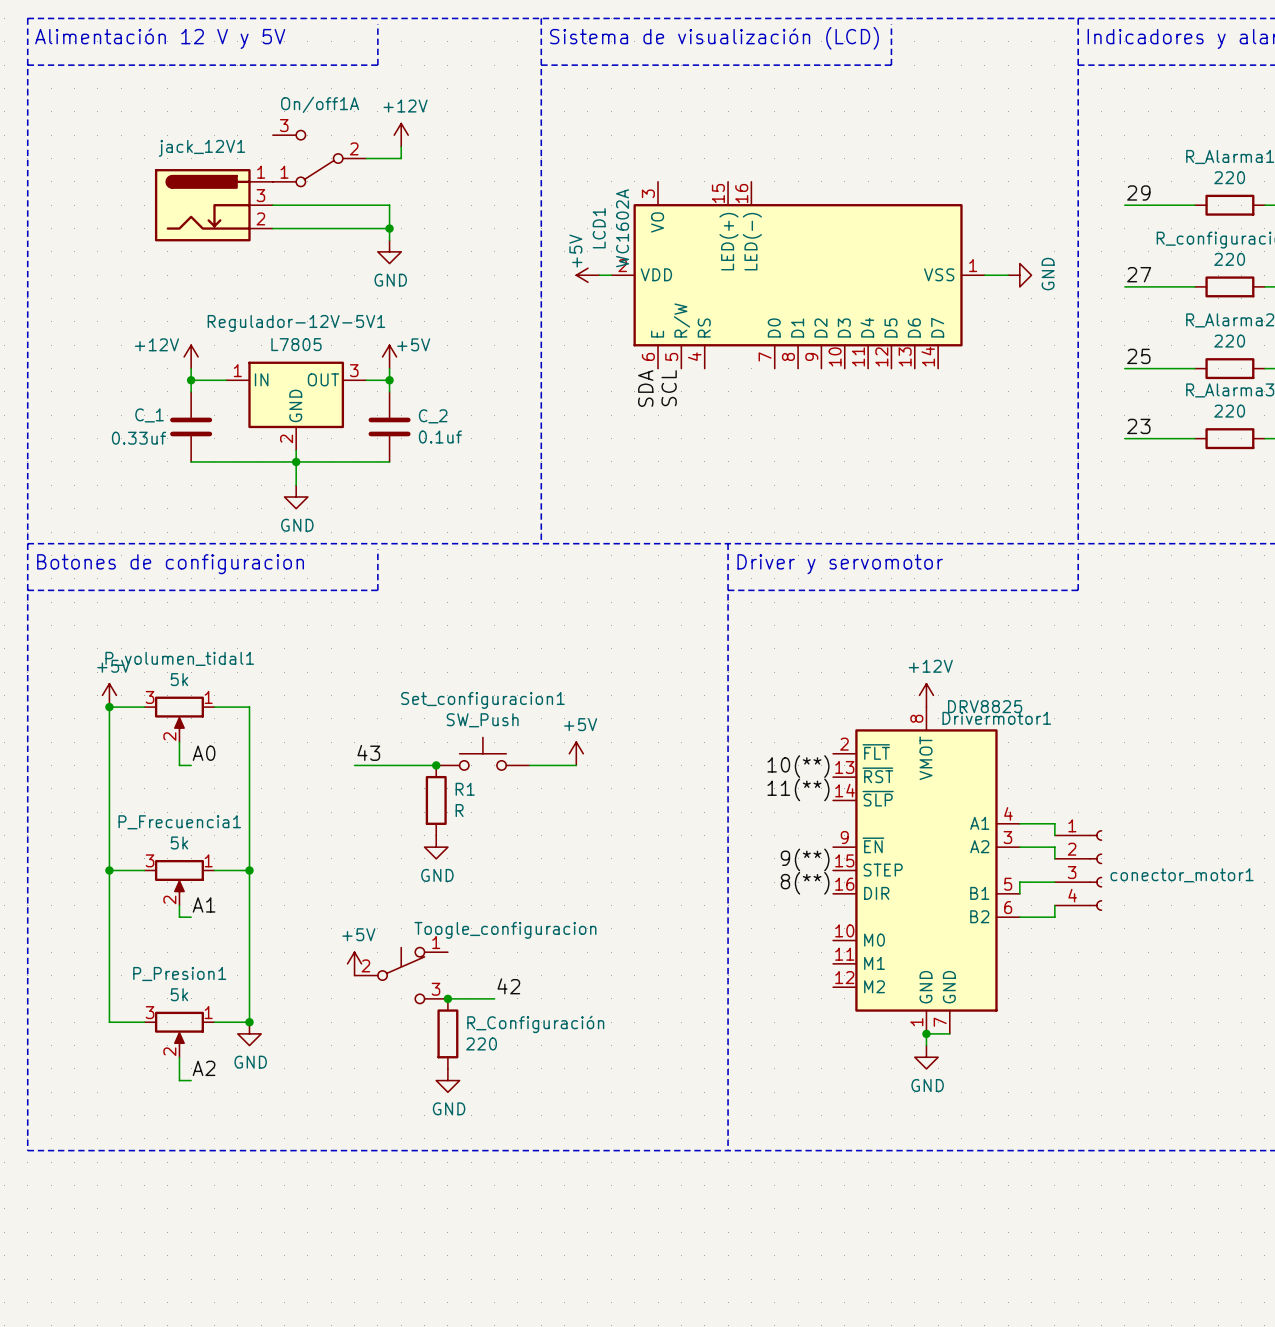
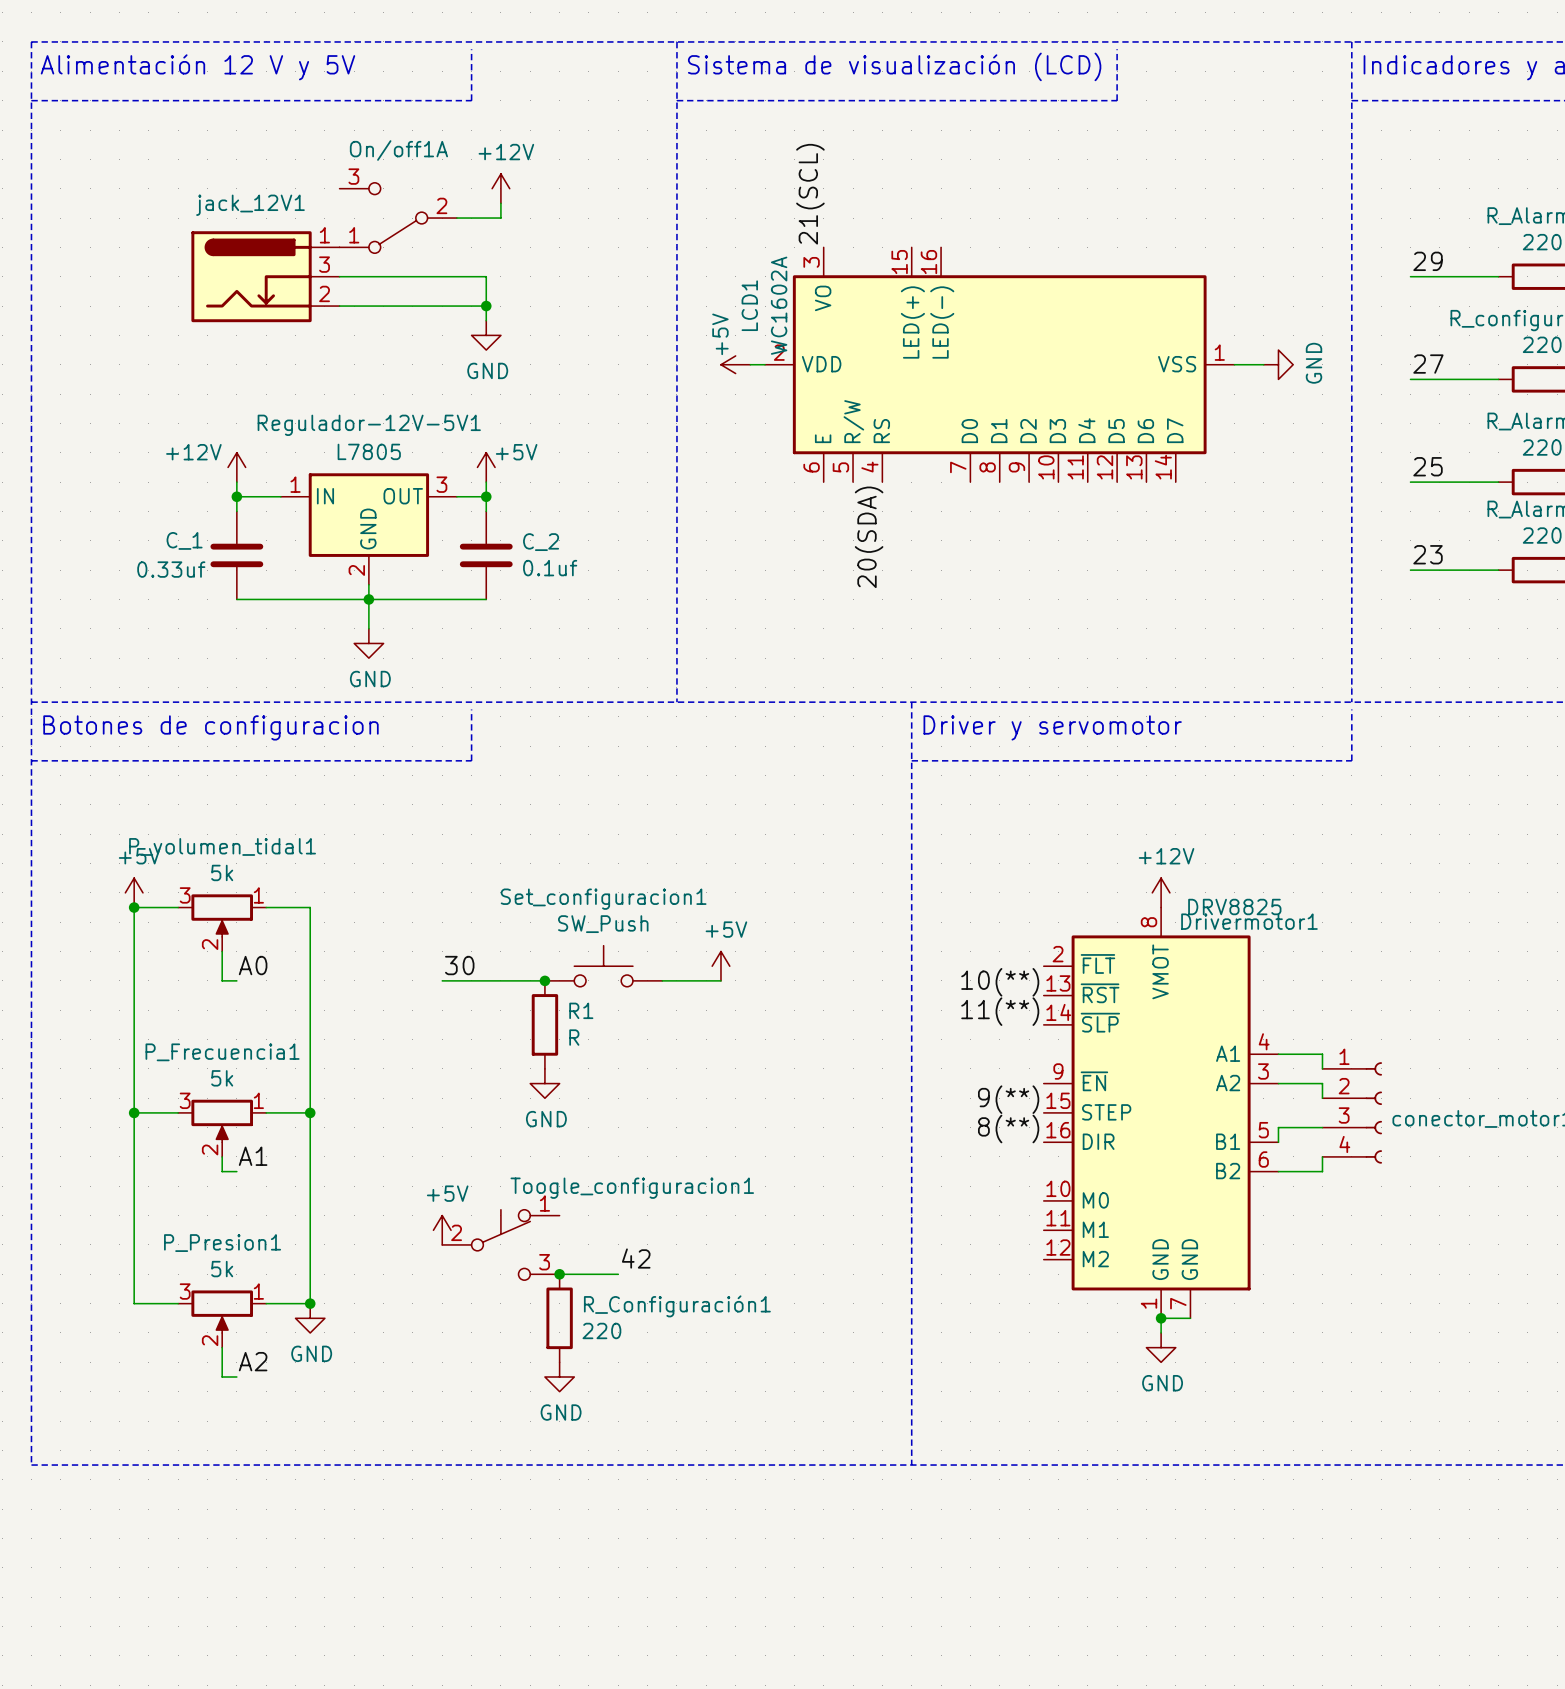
label: none -> 21(SCL) (810, 194)
label: SDA (645, 388) -> none
label: SCL (669, 388) -> none
label: none -> 20(SDA) (869, 537)
label: 43 (368, 752) -> 30 (459, 965)
Toogle_configuracion name: Toogle_configuracion (505, 930) -> Toogle_configuracion1 (632, 1188)
R_Configuración name: R_Configuración (535, 1024) -> R_Configuración1 (677, 1306)

